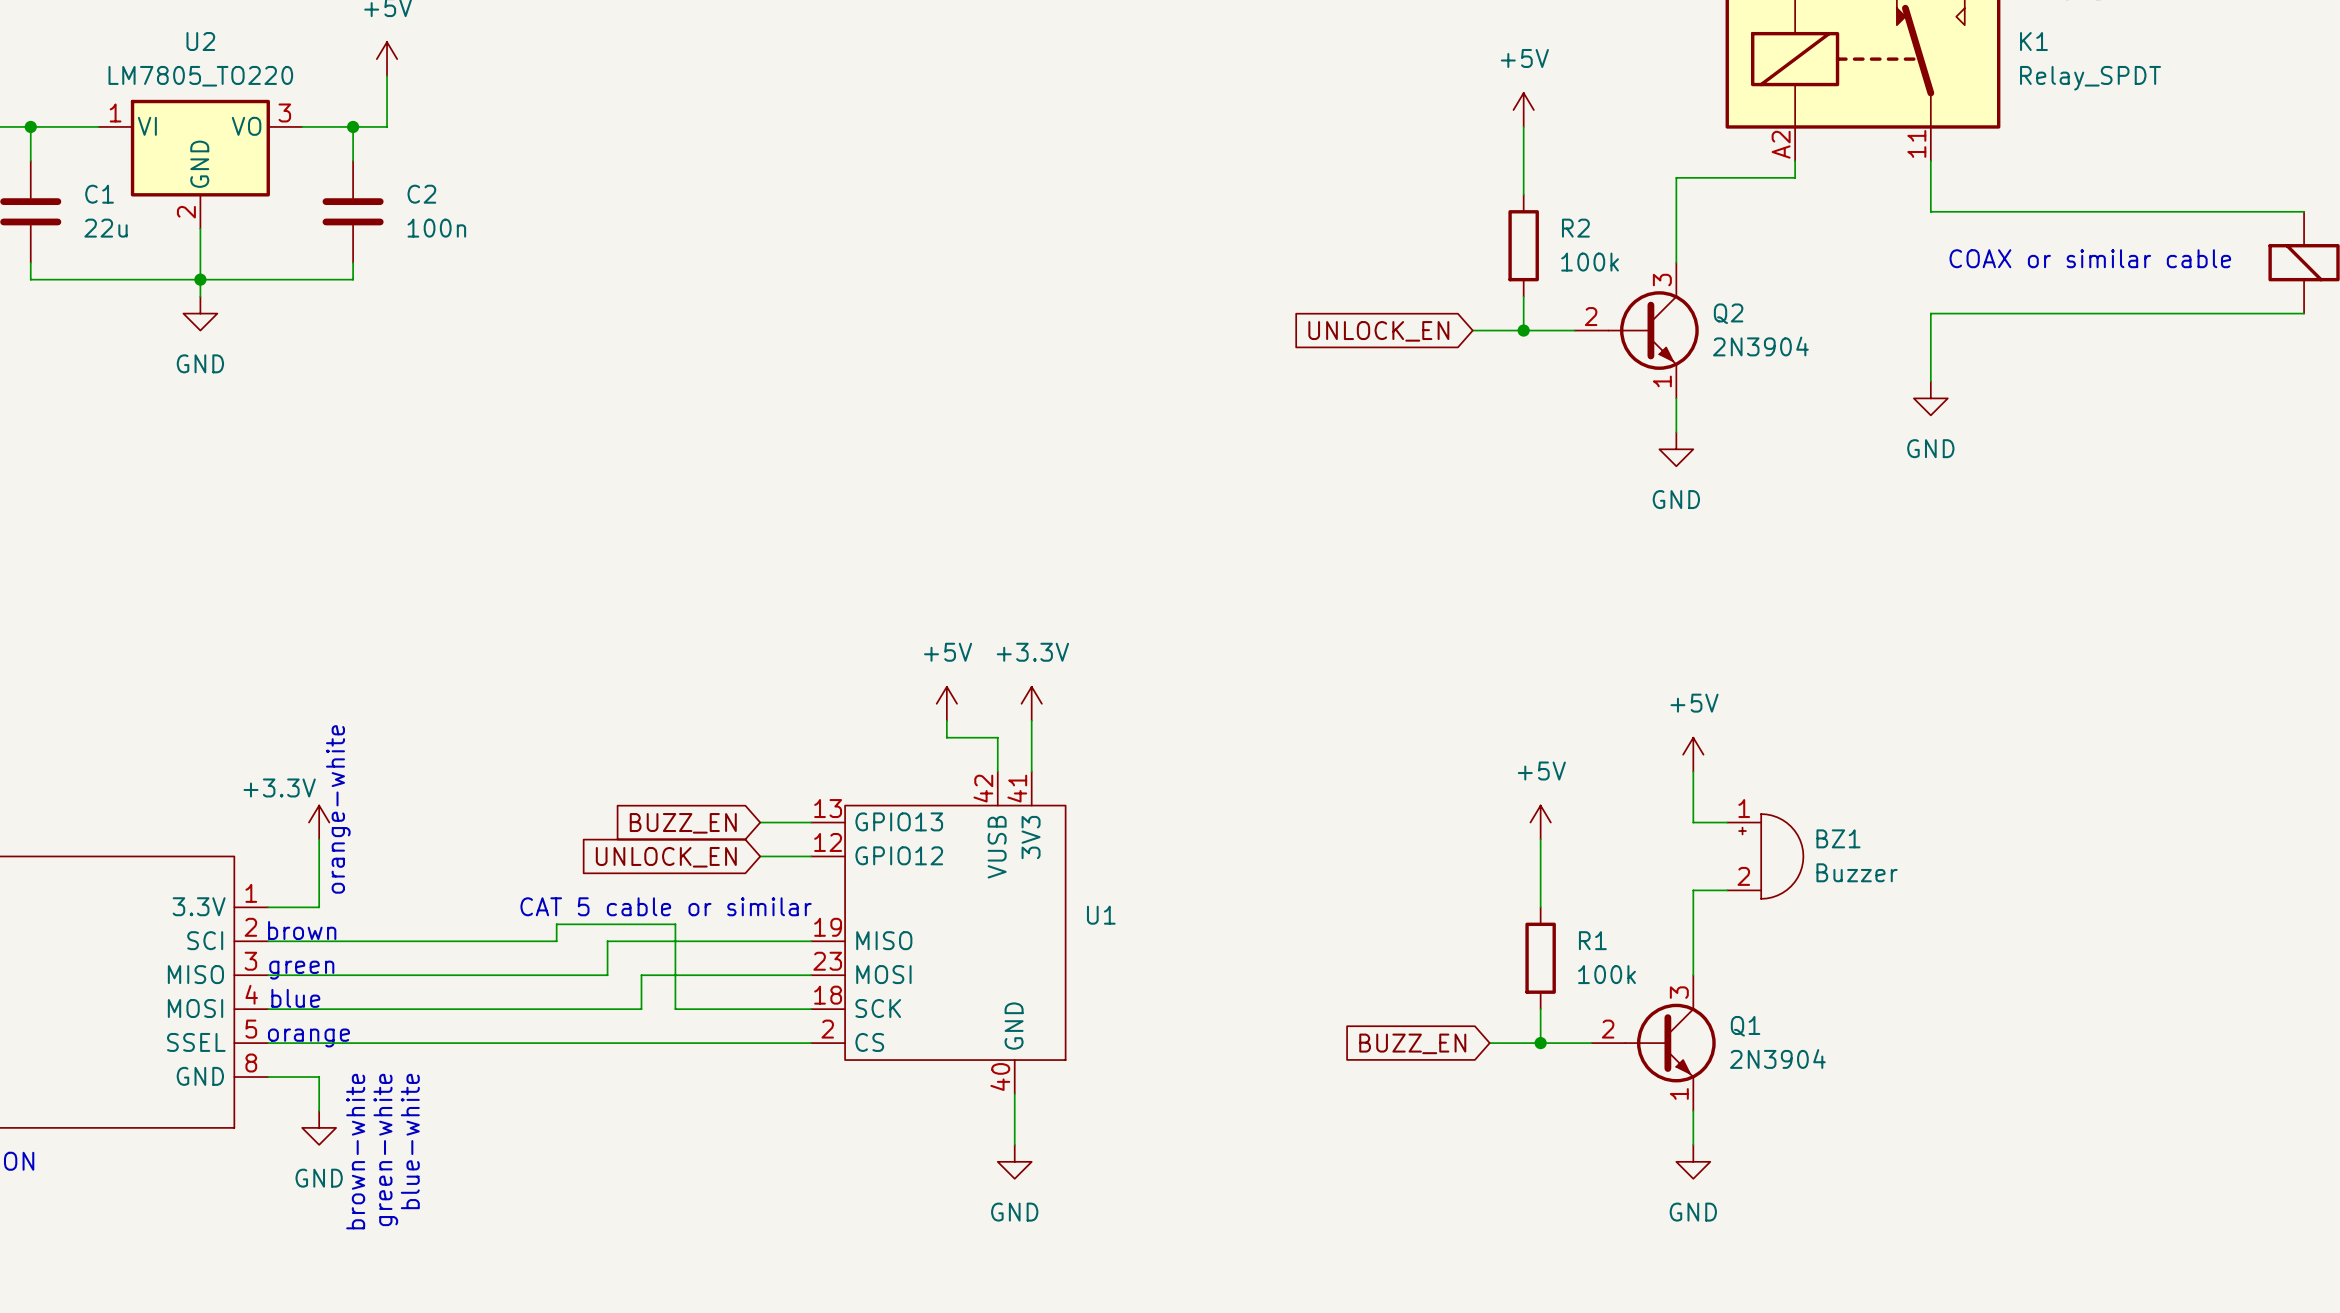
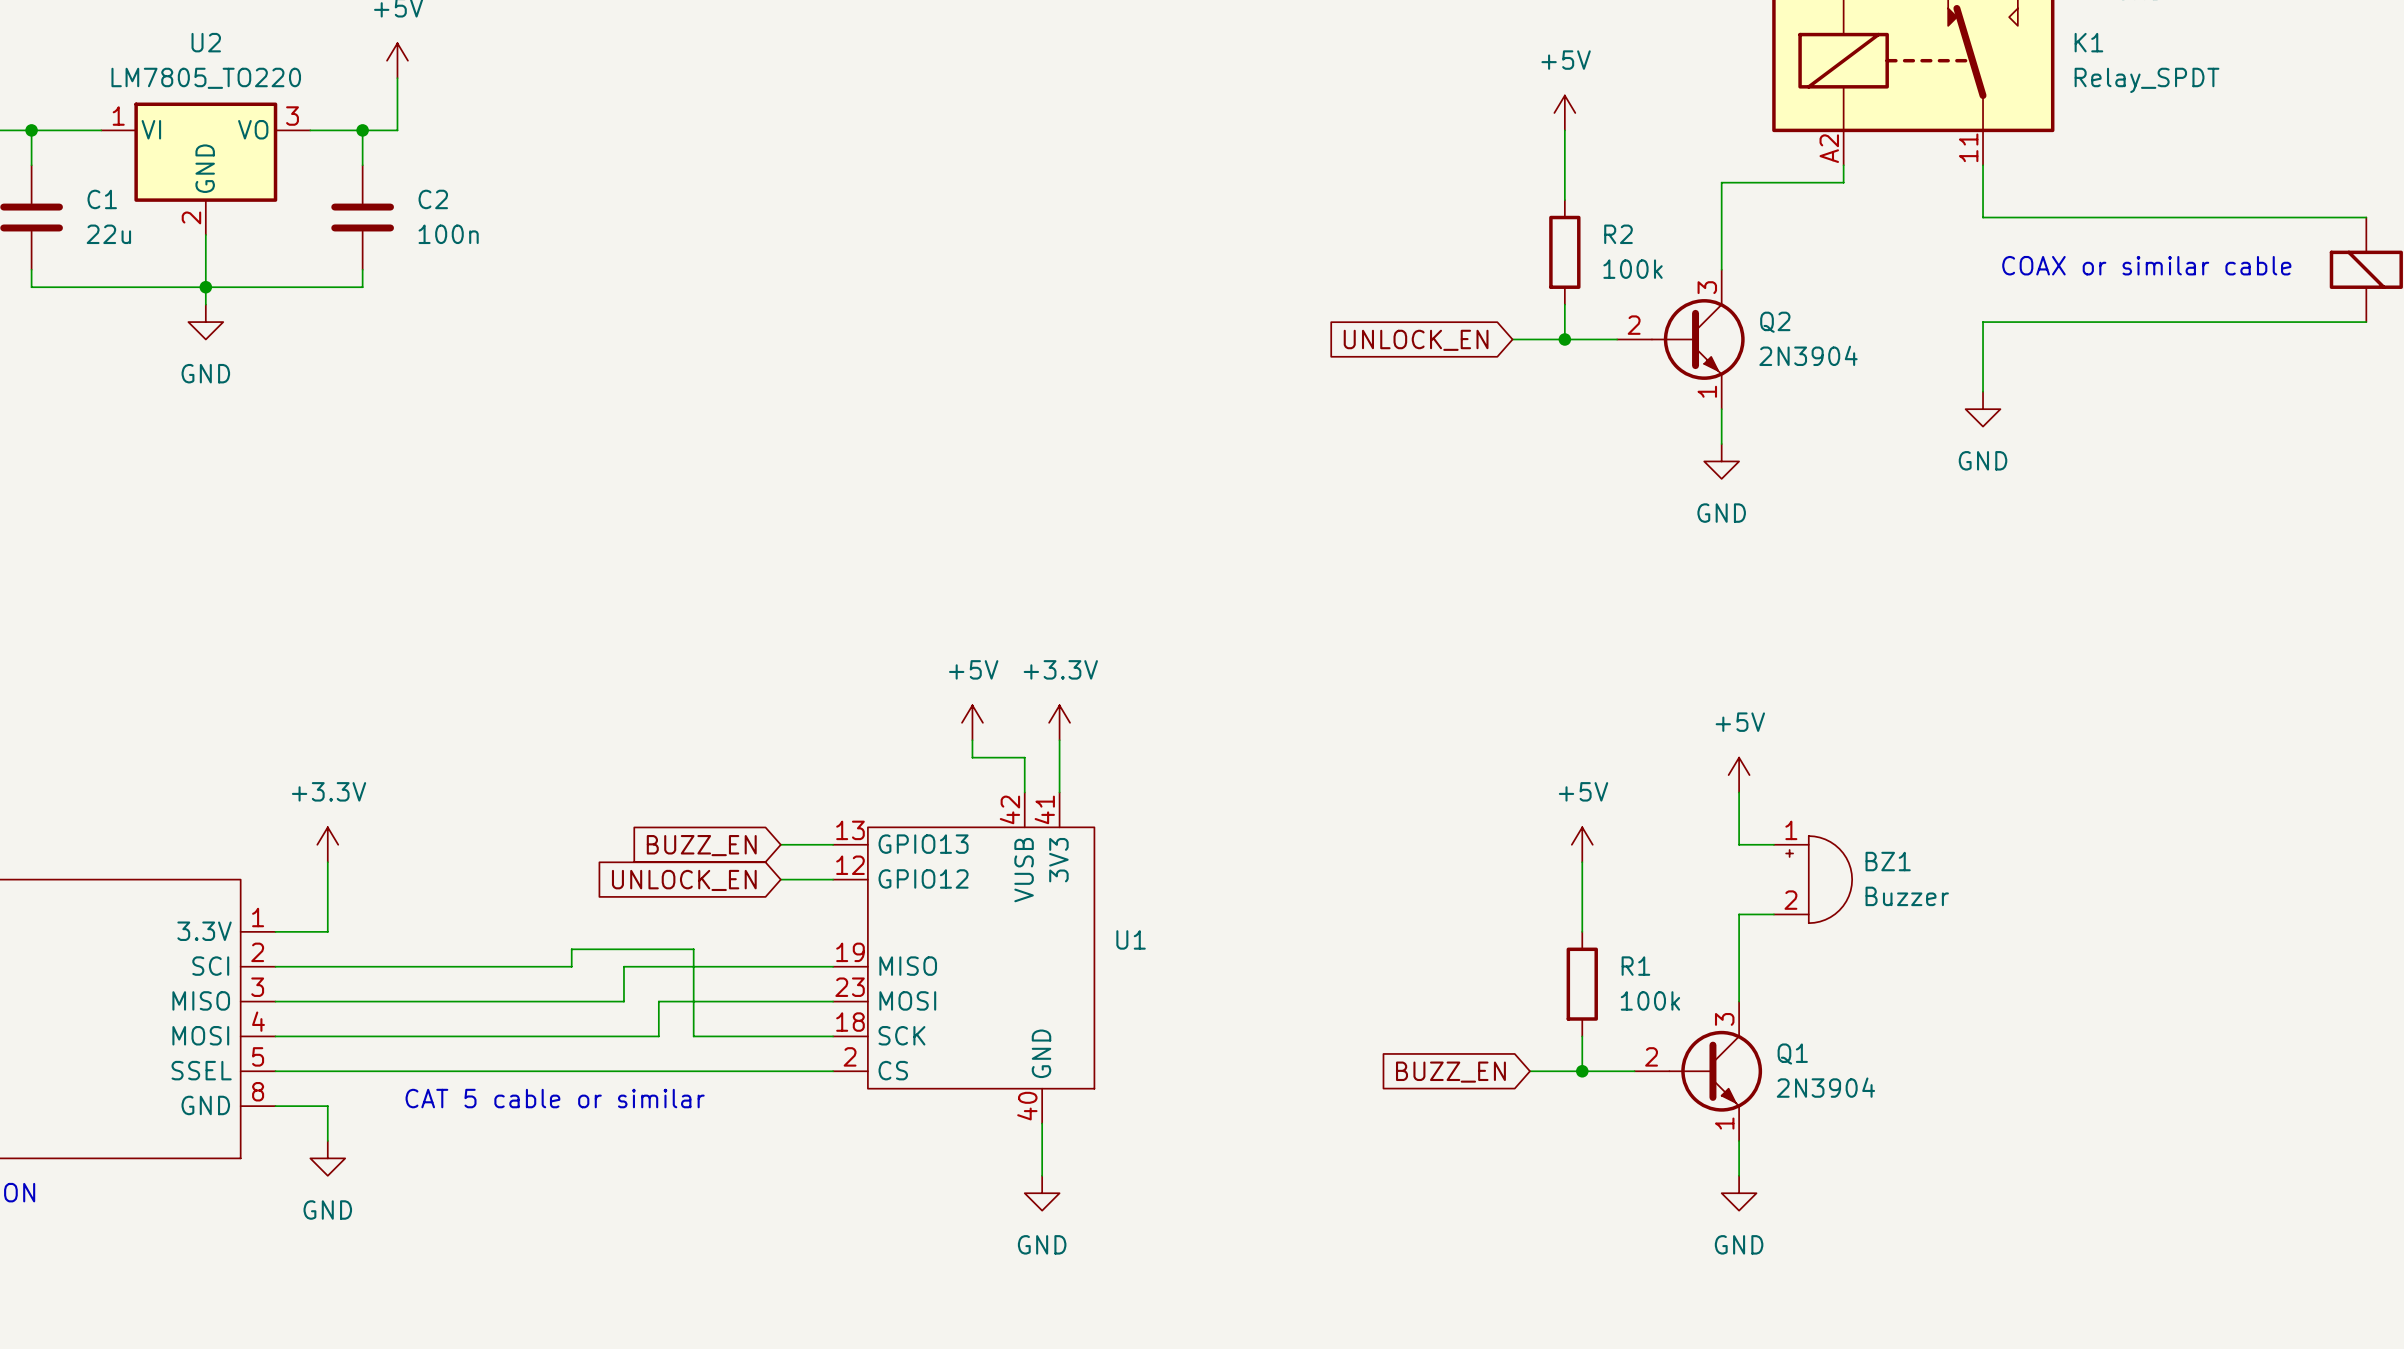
power symbol text position: +3.3V (279, 787) -> +3.3V (329, 791)
text: orange-white (338, 809) -> none
text position: CAT 5 cable or similar (666, 906) -> CAT 5 cable or similar (555, 1098)
text: brown (302, 930) -> none
text: green (301, 970) -> none
text: blue (295, 998) -> none
text: orange (308, 1037) -> none
text: blue-white (410, 1141) -> none
text: green-white (385, 1149) -> none
text: brown-white (355, 1151) -> none

